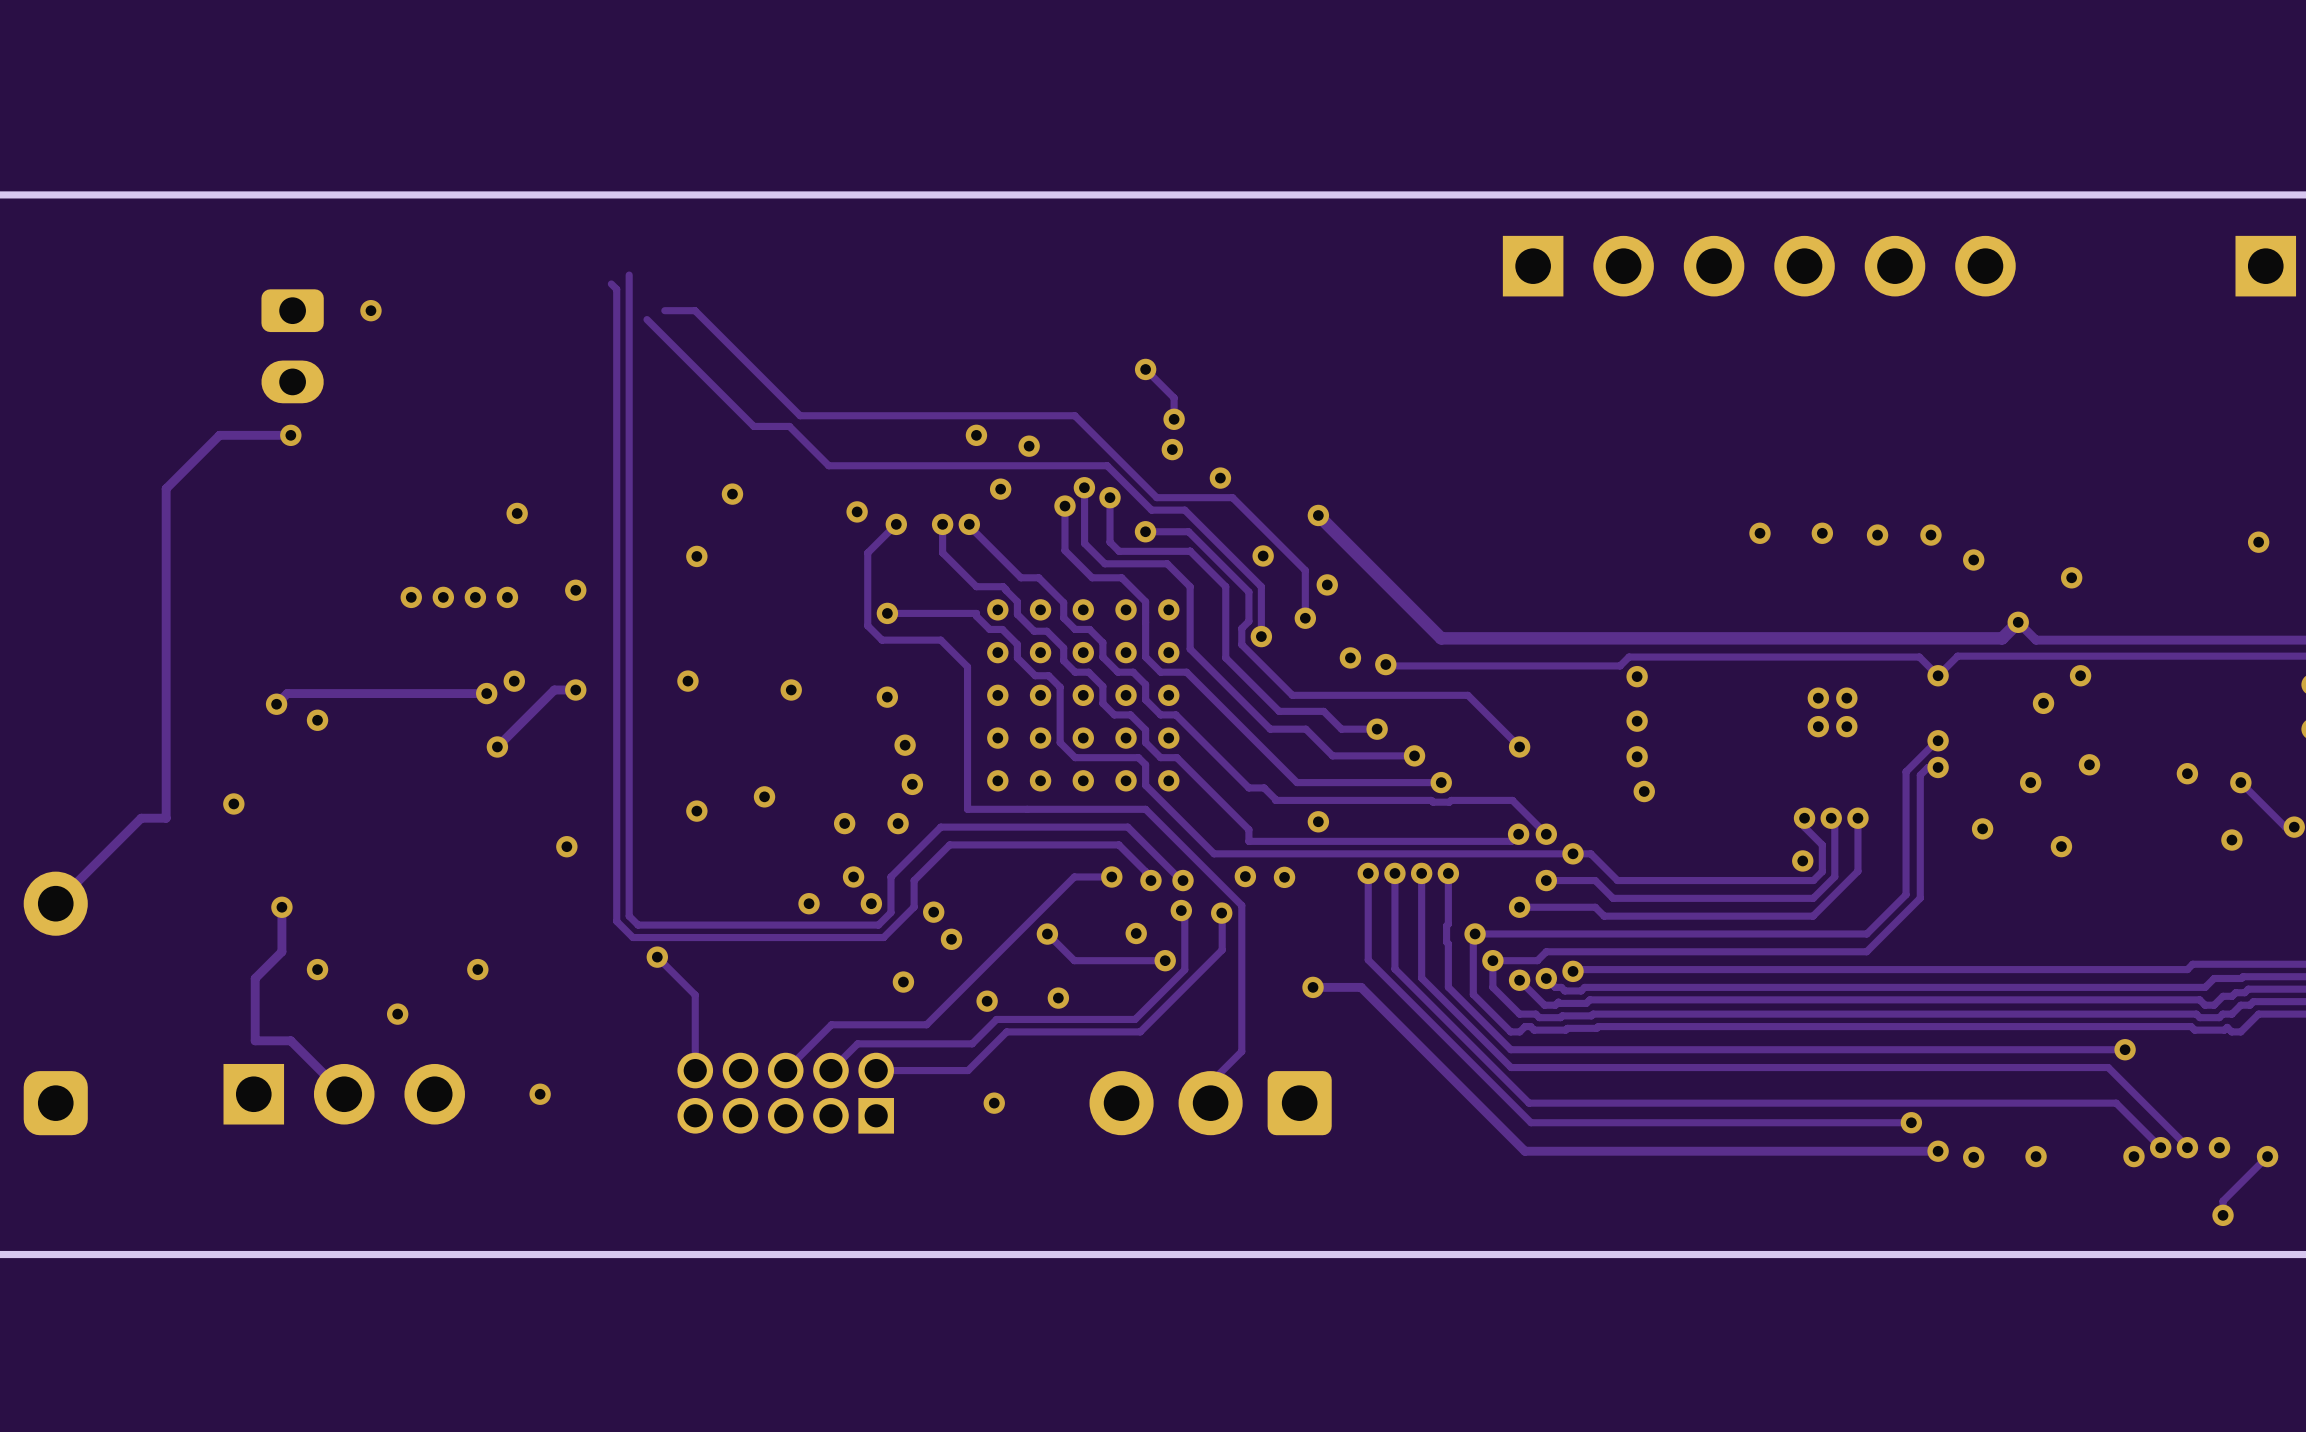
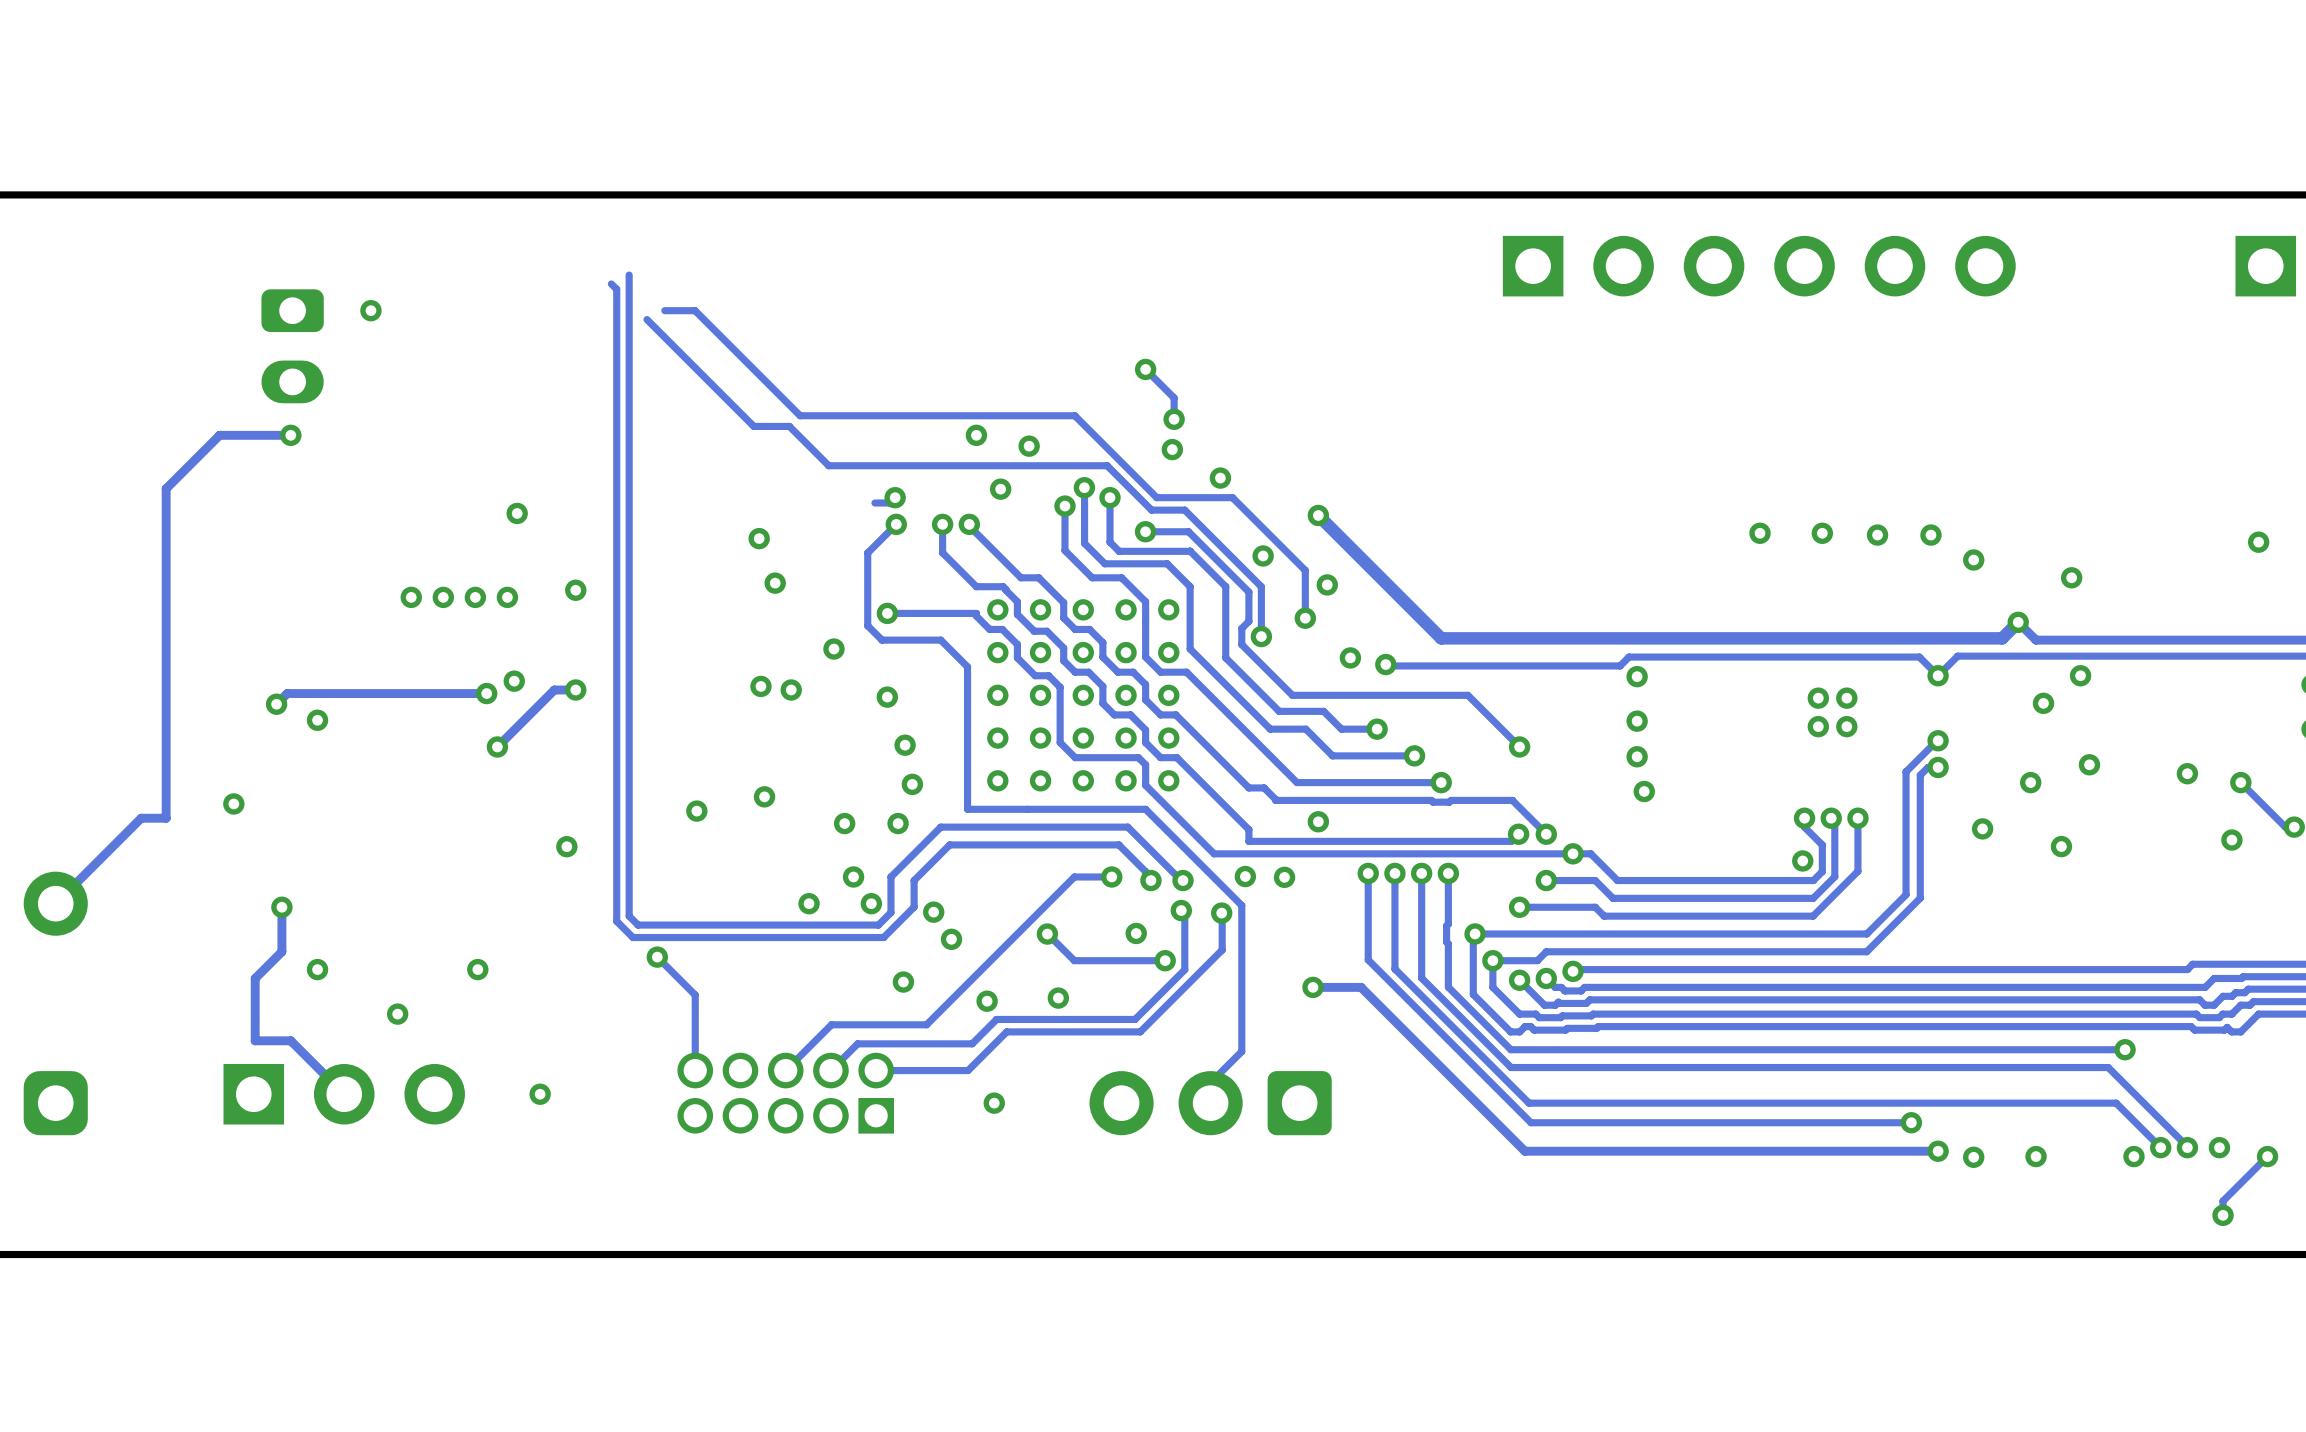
via: (732, 494) -> none
track: none -> (895, 497) (889, 503) (874, 503)
via position: (857, 511) -> (895, 497)
via: none -> (759, 538)
via: (696, 556) -> none
via: none -> (775, 583)
via: none -> (833, 649)
via: (687, 681) -> none
via: none -> (760, 686)

